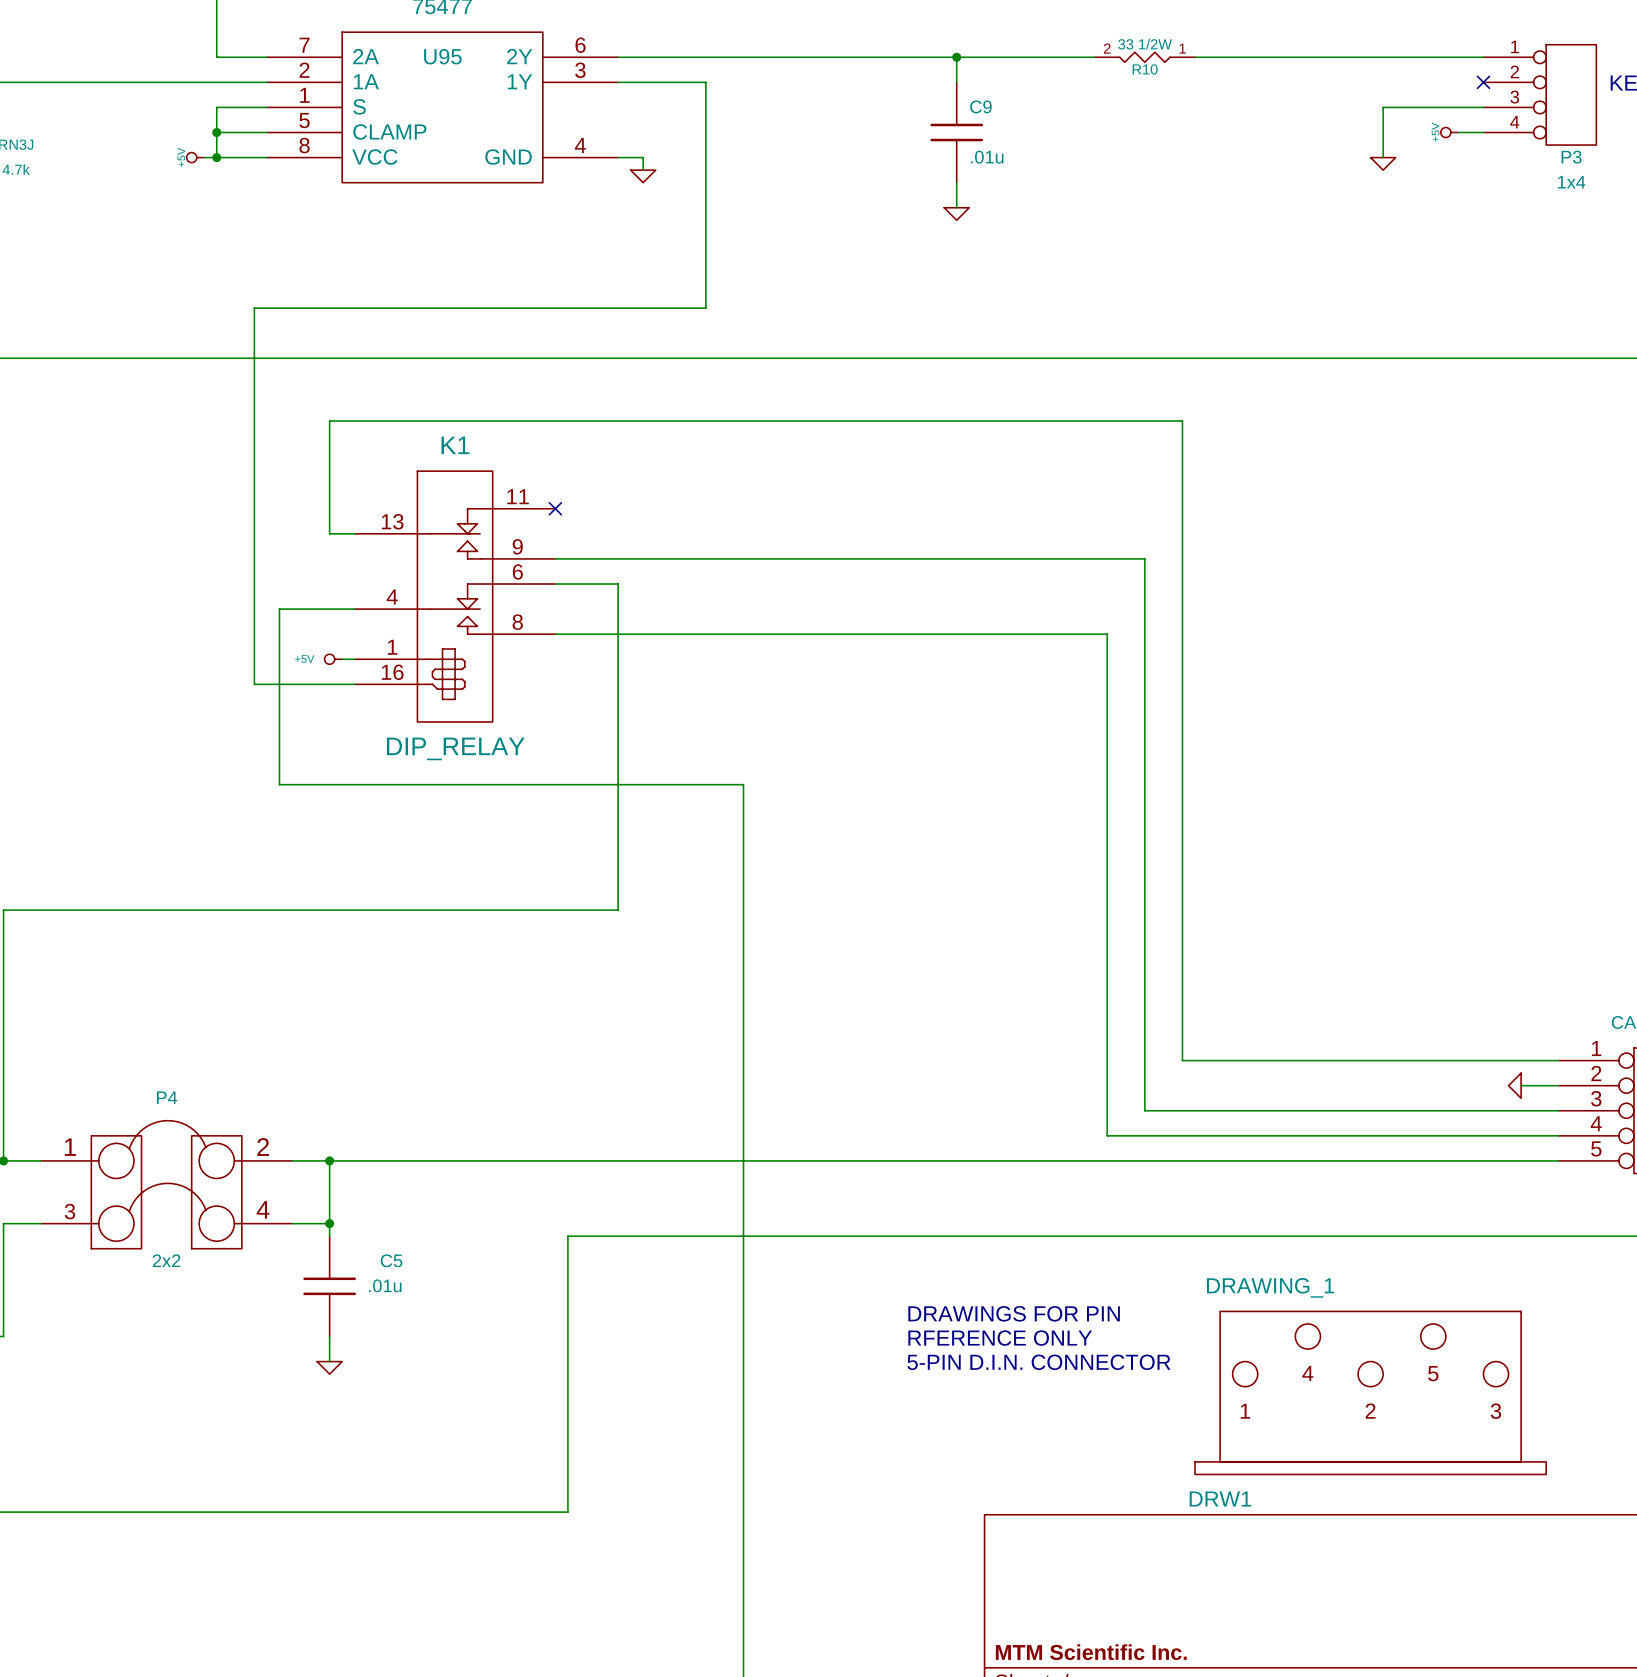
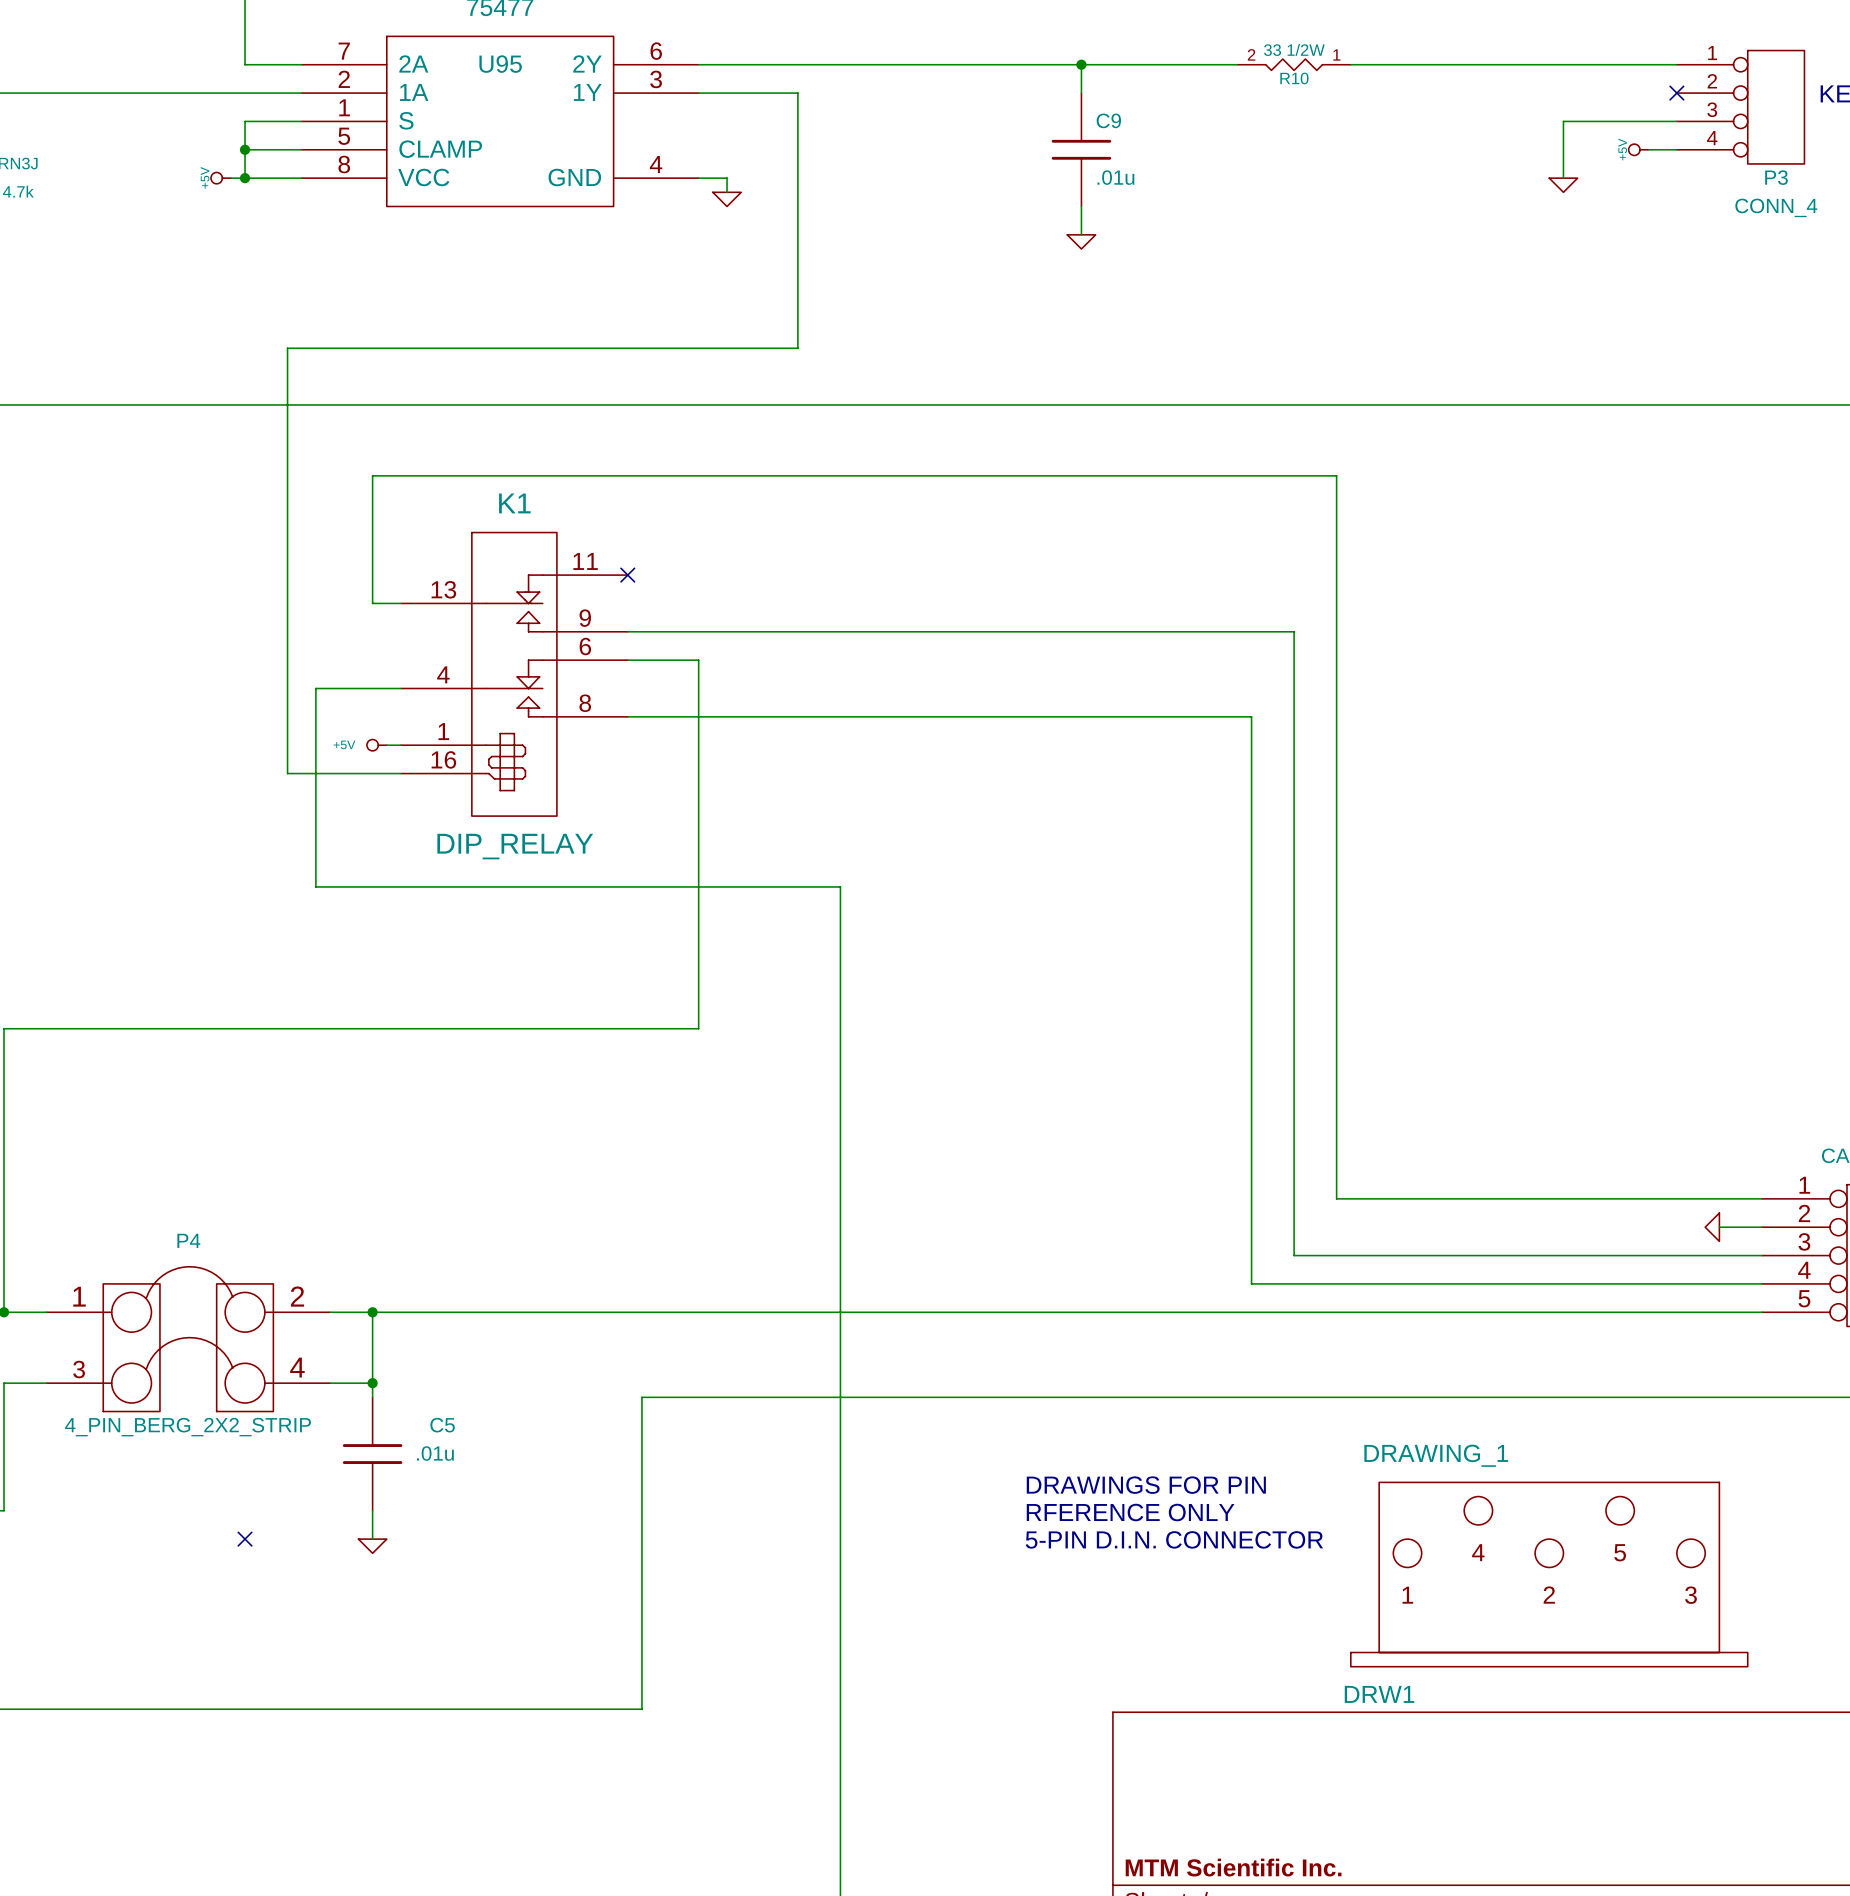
P3 value: 1x4 (1571, 182) -> CONN_4 (1776, 207)
P4 value: 2x2 (166, 1260) -> 4_PIN_BERG_2X2_STRIP (188, 1427)
no-connect mark: none -> (245, 1539)

